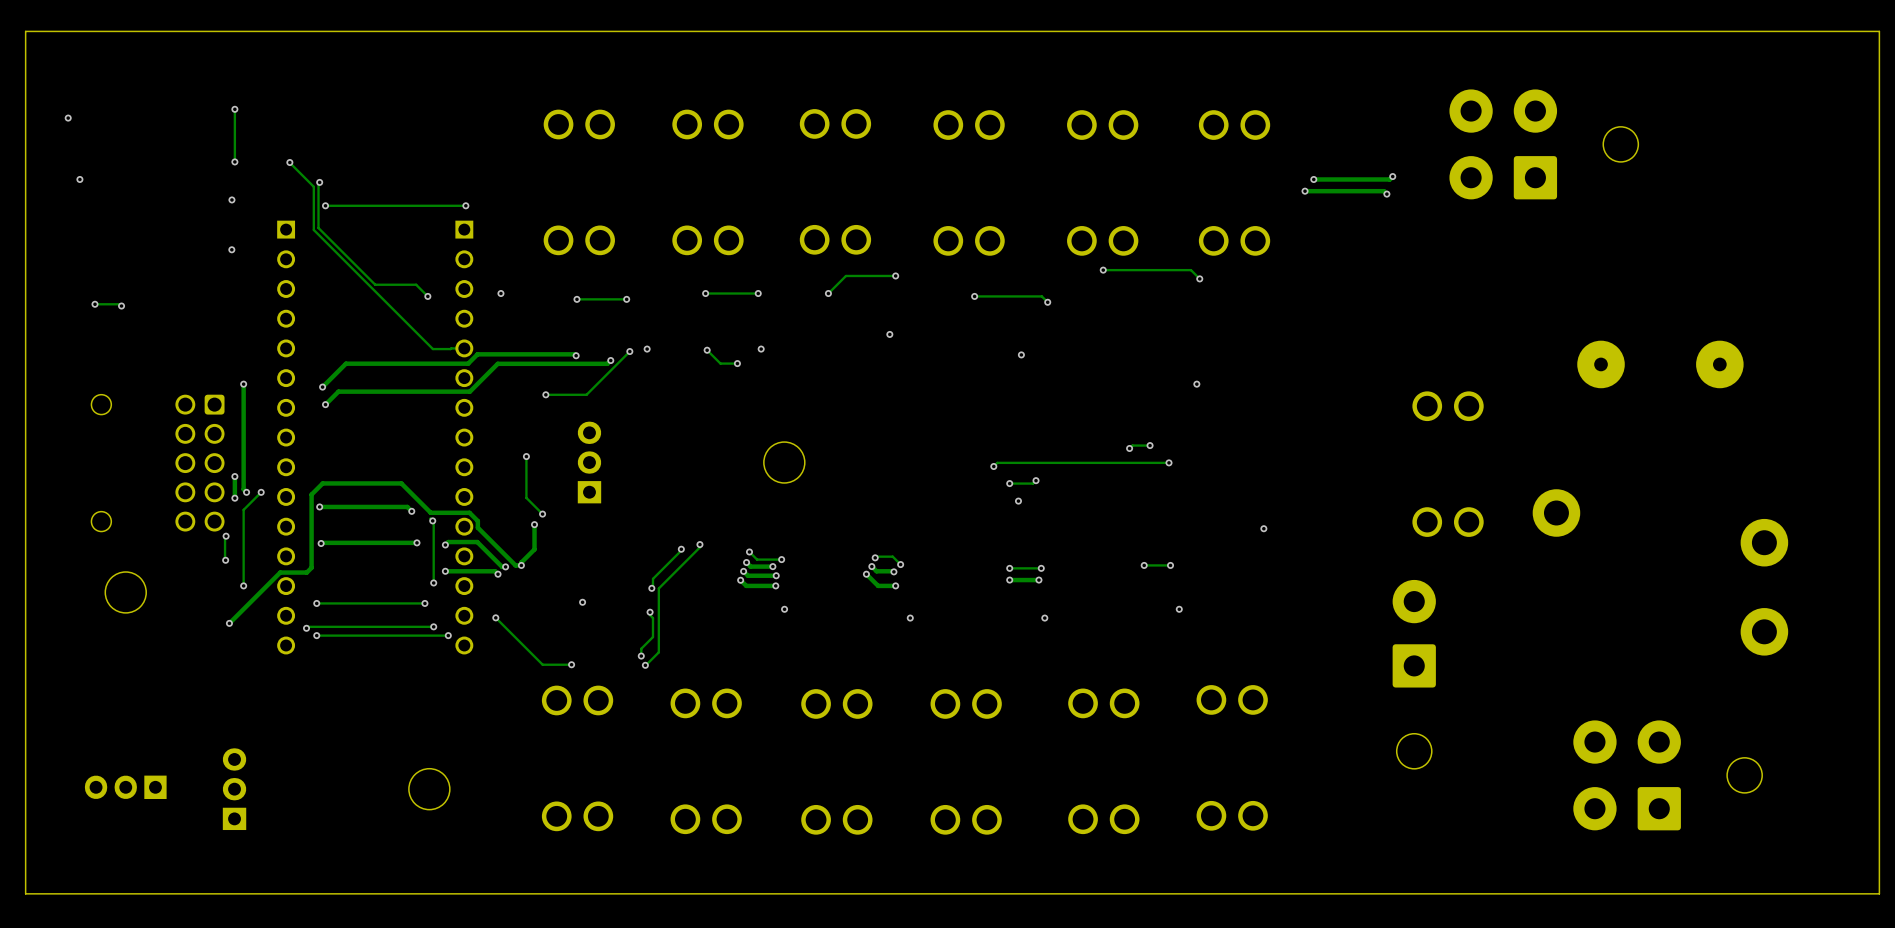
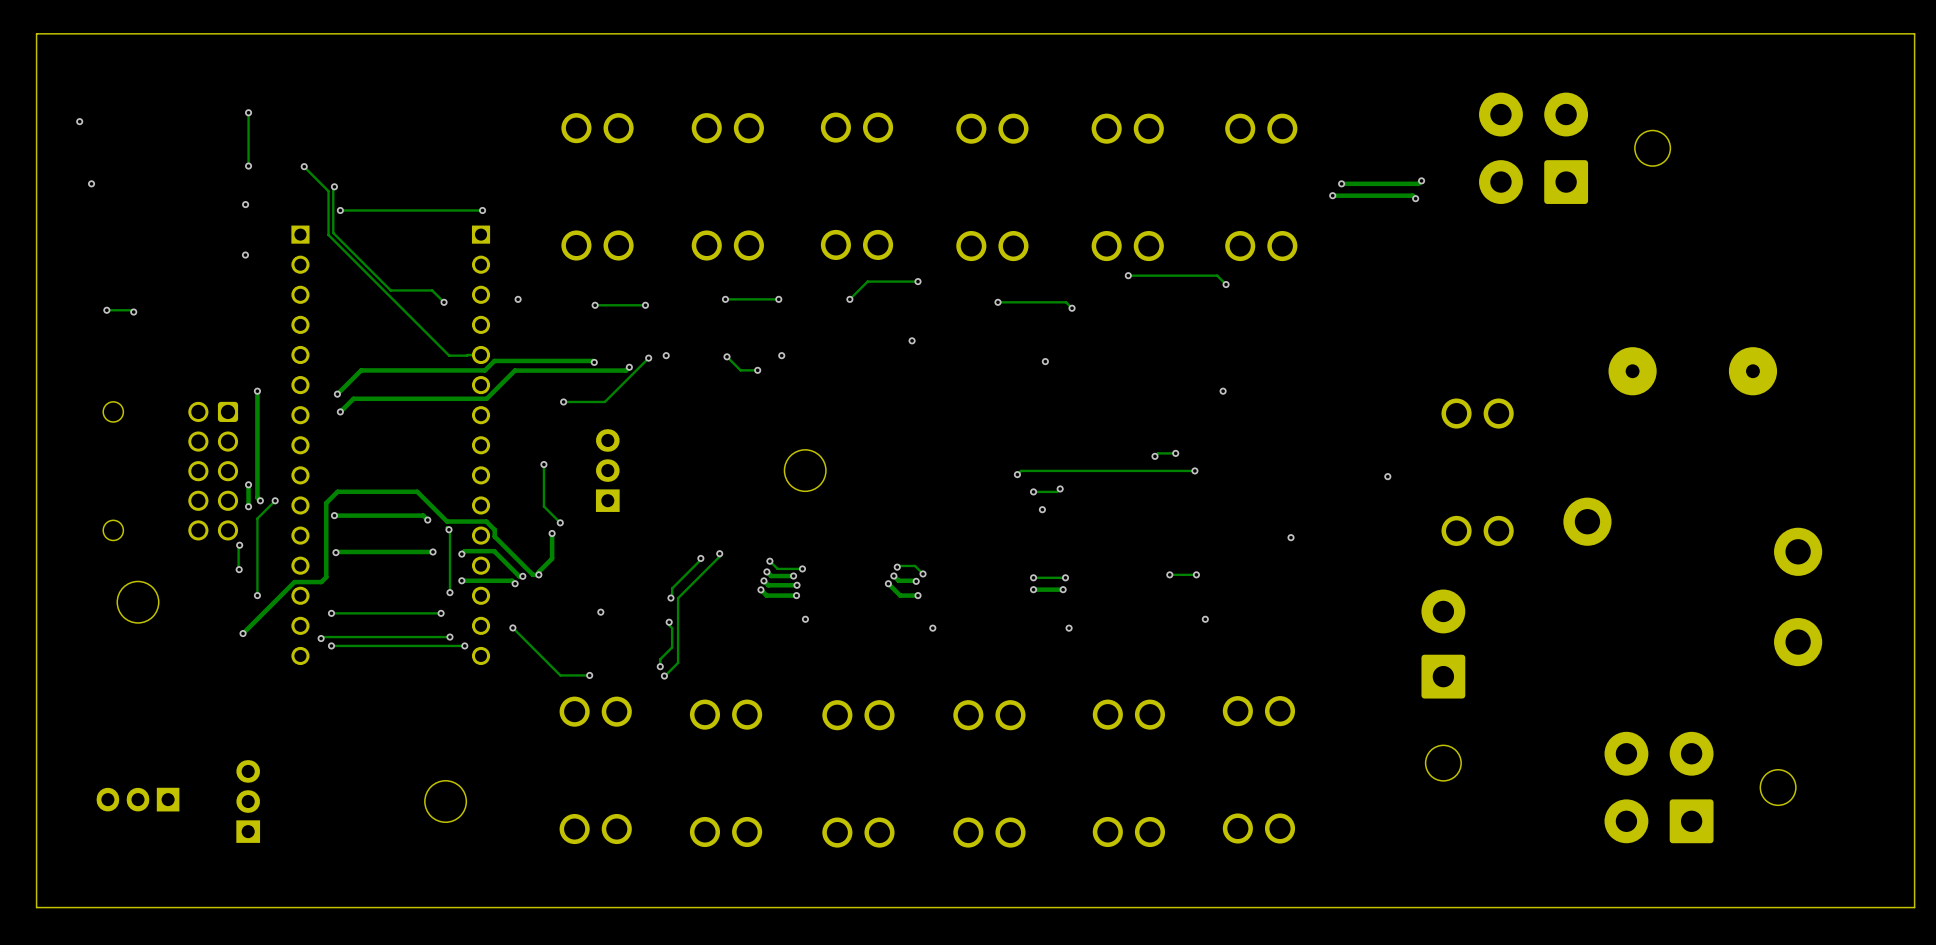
via: none -> (1387, 476)

